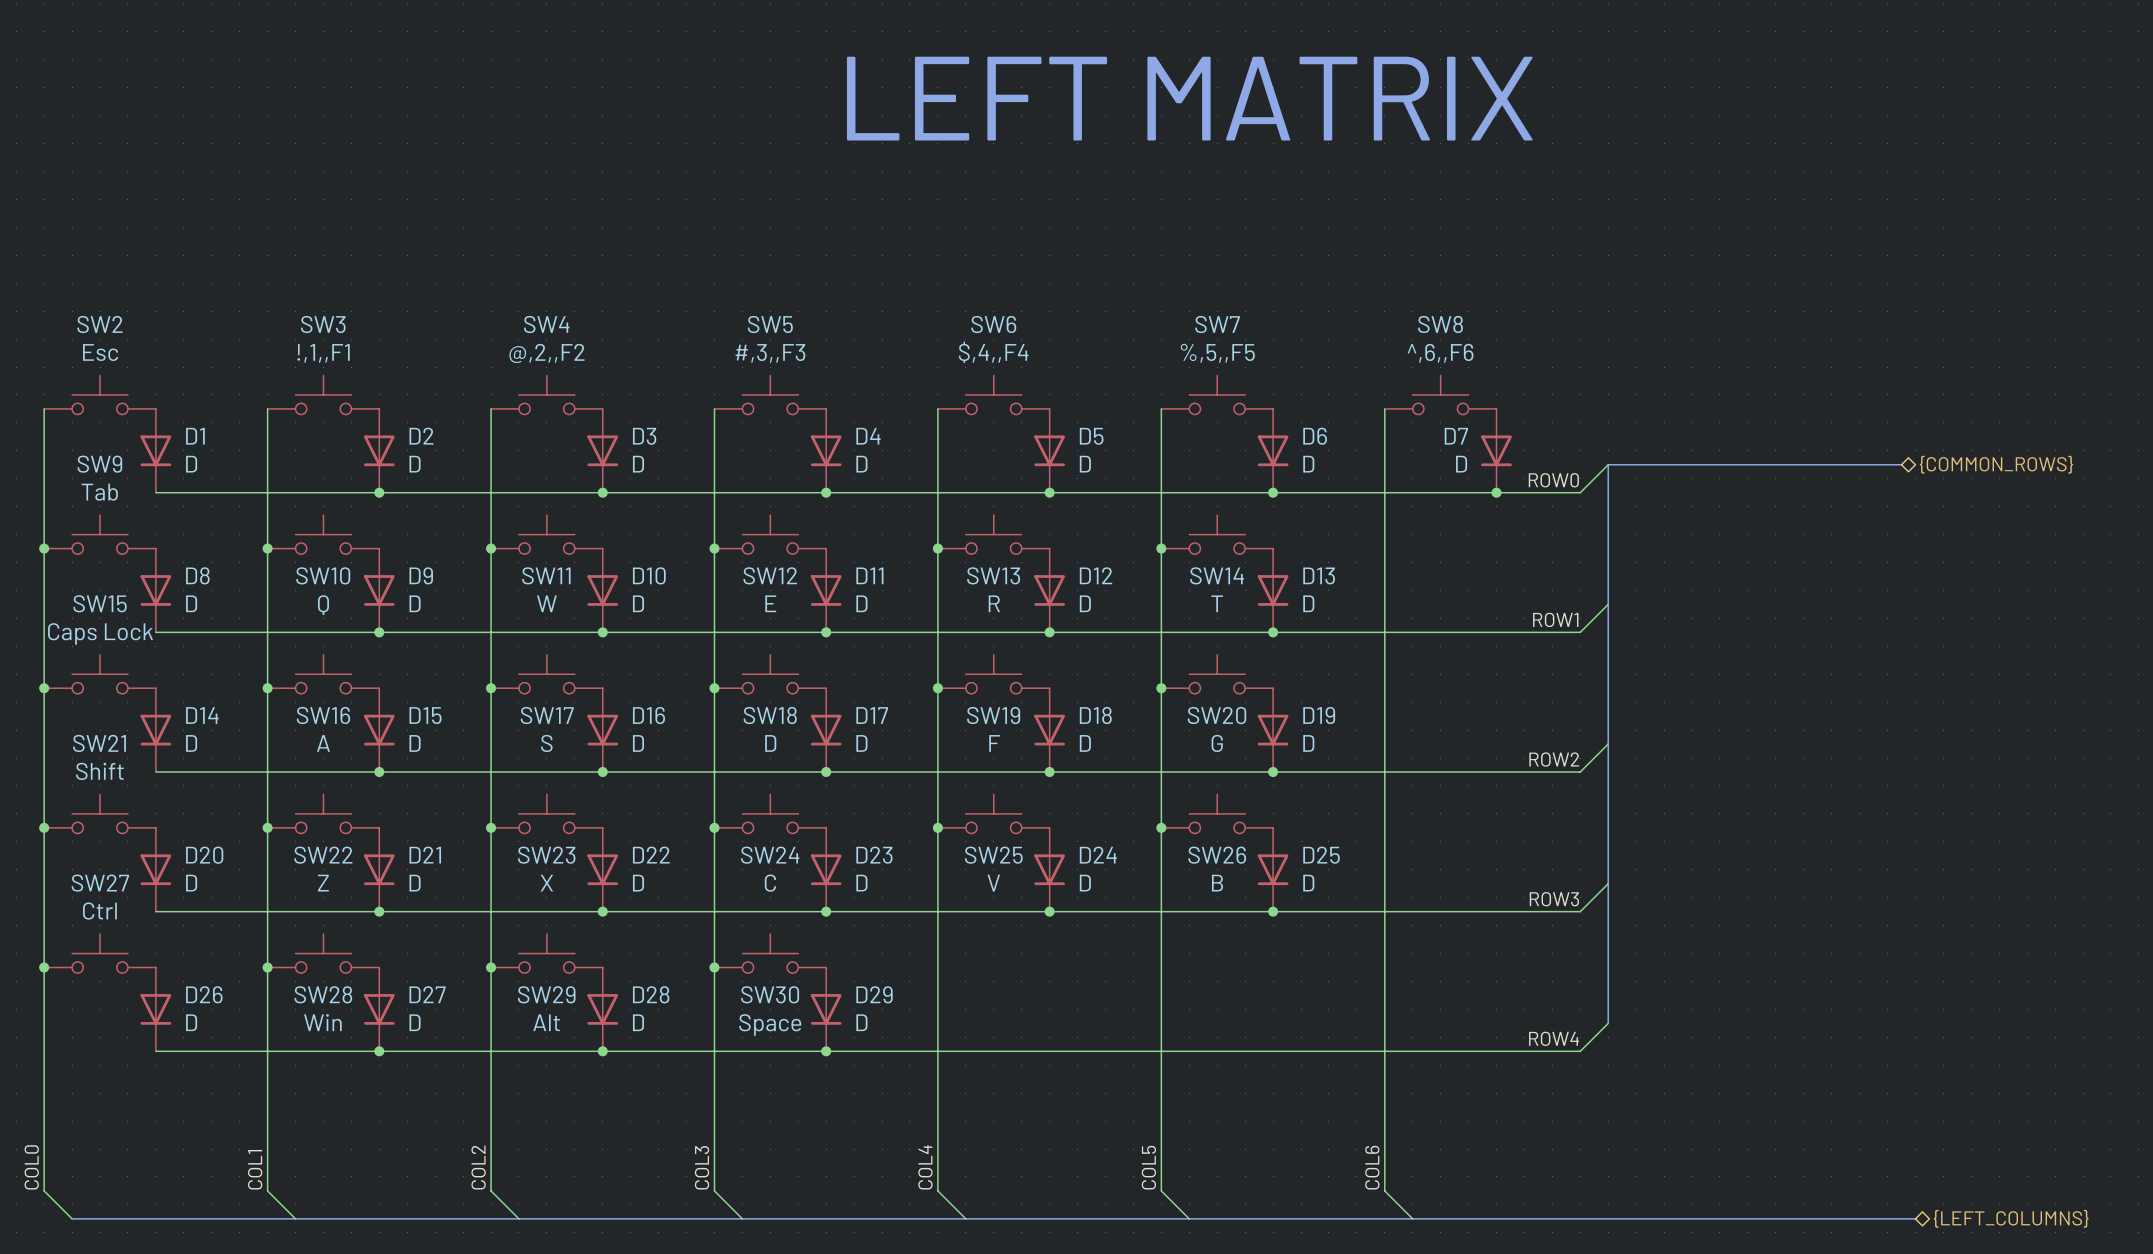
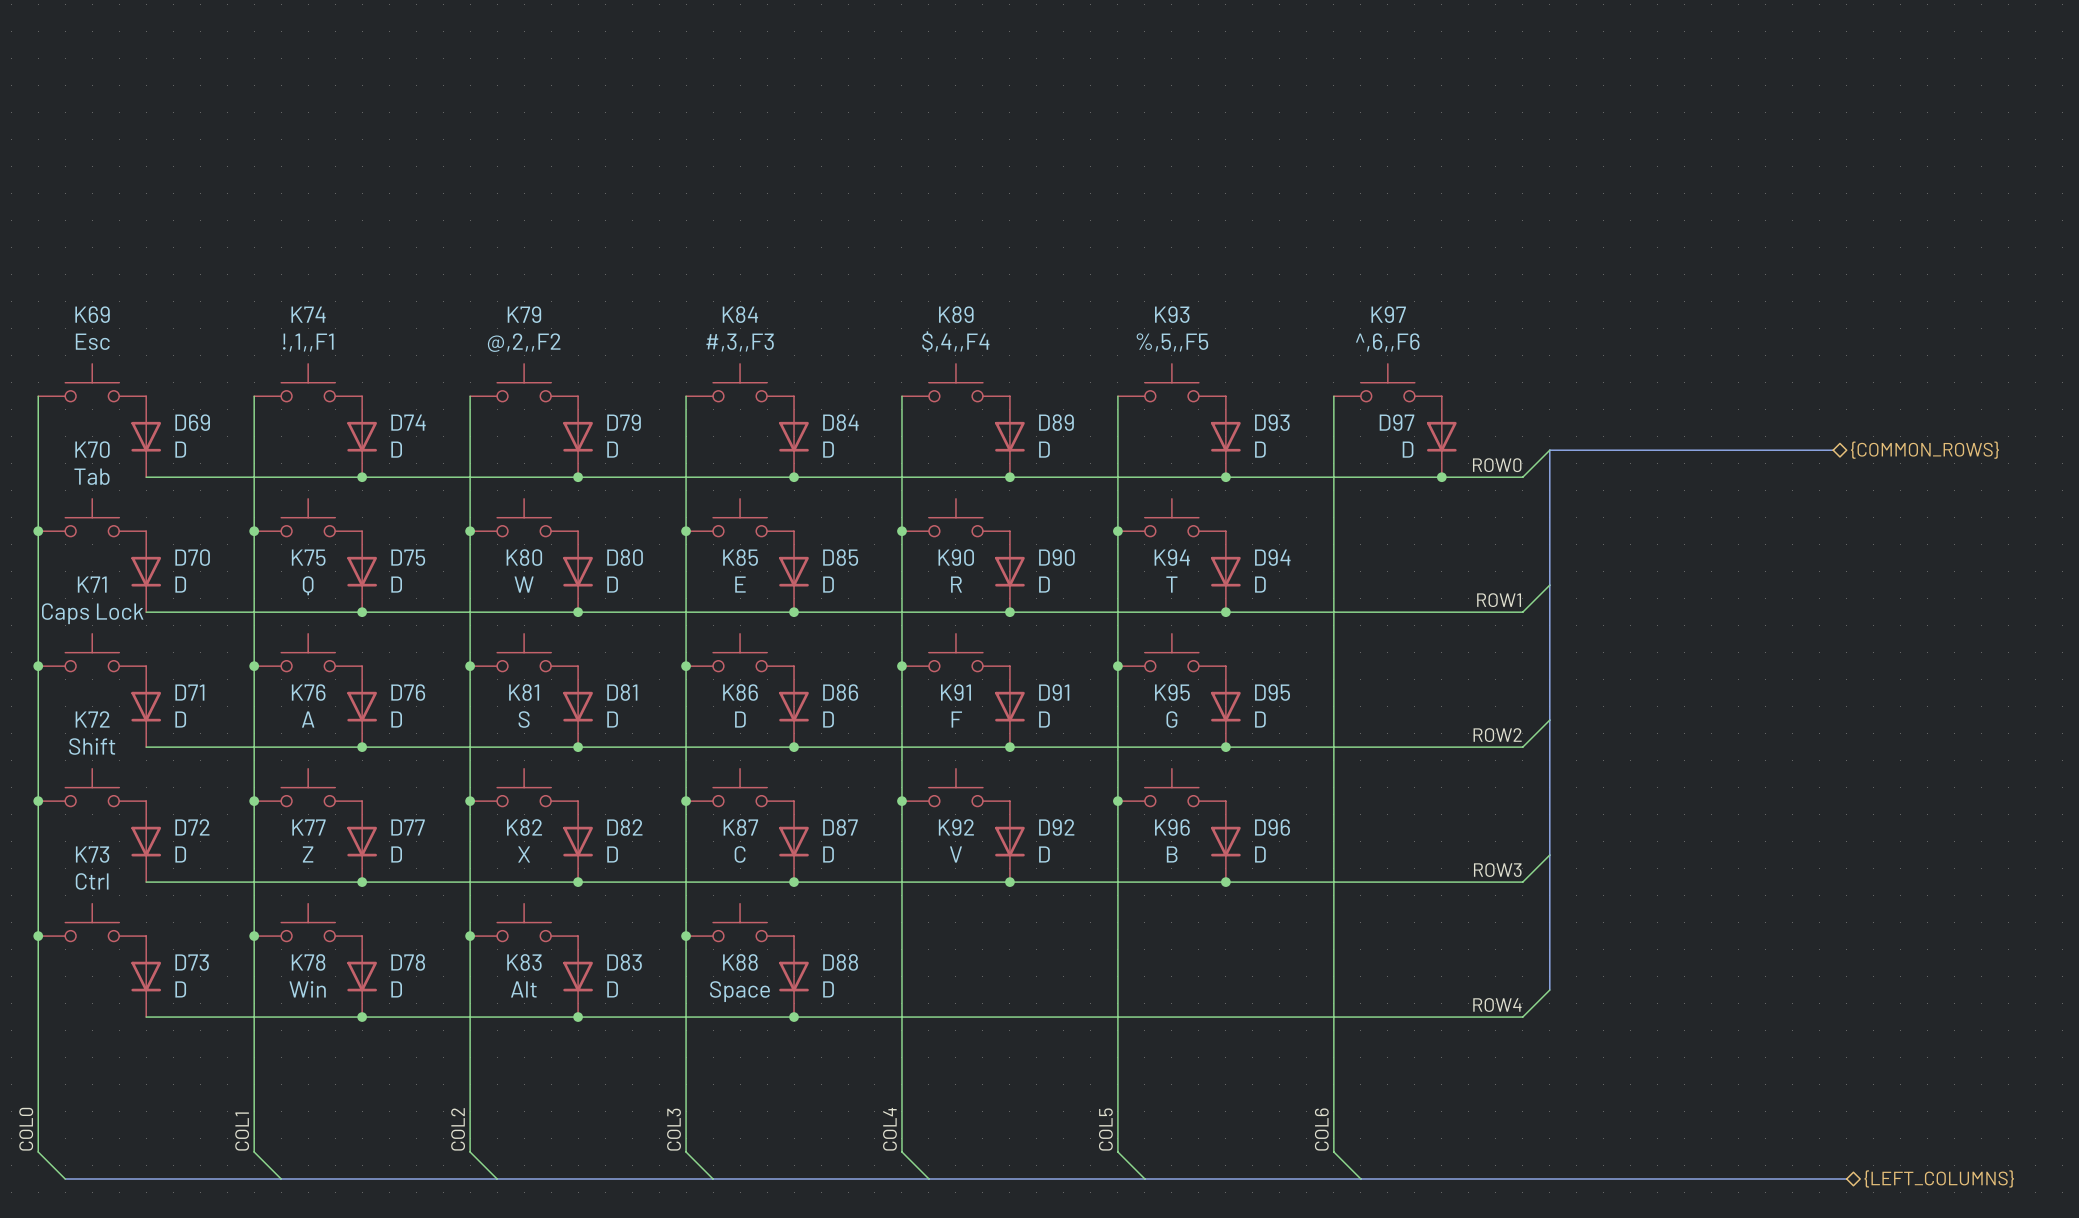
text: LEFT MATRIX (1189, 98) -> none
SW2 name: SW2 (99, 324) -> K69 (92, 314)
SW3 name: SW3 (323, 324) -> K74 (308, 314)
SW4 name: SW4 (546, 324) -> K79 (524, 314)
SW5 name: SW5 (770, 324) -> K84 (740, 314)
SW6 name: SW6 (993, 324) -> K89 (956, 314)
SW7 name: SW7 (1217, 324) -> K93 (1172, 314)
SW8 name: SW8 (1440, 324) -> K97 (1388, 314)
D1 name: D1 (195, 436) -> D69 (192, 422)
D2 name: D2 (421, 436) -> D74 (408, 422)
D3 name: D3 (644, 436) -> D79 (624, 422)
D4 name: D4 (868, 436) -> D84 (840, 422)
D5 name: D5 (1091, 436) -> D89 (1056, 422)
D6 name: D6 (1315, 436) -> D93 (1272, 422)
D7 name: D7 (1456, 436) -> D97 (1397, 422)
SW9 name: SW9 (99, 464) -> K70 (92, 449)
D8 name: D8 (197, 575) -> D70 (192, 557)
SW10 name: SW10 (323, 575) -> K75 (308, 557)
D9 name: D9 (421, 575) -> D75 (408, 557)
SW11 name: SW11 (546, 575) -> K80 (524, 557)
D10 name: D10 (649, 575) -> D80 (625, 557)
SW12 name: SW12 (770, 575) -> K85 (740, 557)
D11 name: D11 (869, 575) -> D85 (840, 557)
SW13 name: SW13 (993, 575) -> K90 (956, 557)
D12 name: D12 (1096, 575) -> D90 (1056, 557)
SW14 name: SW14 (1217, 575) -> K94 (1172, 557)
D13 name: D13 (1319, 575) -> D94 (1272, 557)
SW15 name: SW15 (100, 603) -> K71 (92, 584)
D14 name: D14 (202, 715) -> D71 (189, 692)
SW16 name: SW16 (323, 715) -> K76 (308, 692)
D15 name: D15 (425, 715) -> D76 (408, 692)
SW17 name: SW17 (547, 715) -> K81 (524, 692)
D16 name: D16 (648, 715) -> D81 (622, 692)
SW18 name: SW18 (770, 715) -> K86 (740, 692)
D17 name: D17 (872, 715) -> D86 (840, 692)
SW19 name: SW19 (993, 715) -> K91 (955, 692)
D18 name: D18 (1095, 715) -> D91 (1054, 692)
SW20 name: SW20 (1216, 715) -> K95 (1172, 692)
D19 name: D19 (1319, 715) -> D95 (1272, 692)
SW21 name: SW21 (99, 743) -> K72 (92, 719)
D20 name: D20 (204, 855) -> D72 (192, 827)
SW22 name: SW22 (323, 855) -> K77 (308, 827)
D21 name: D21 (425, 855) -> D77 (408, 827)
SW23 name: SW23 (546, 855) -> K82 (524, 827)
D22 name: D22 (651, 855) -> D82 (624, 827)
SW24 name: SW24 (770, 855) -> K87 (740, 827)
D23 name: D23 (874, 855) -> D87 (840, 827)
SW25 name: SW25 (993, 855) -> K92 (956, 827)
D24 name: D24 (1098, 855) -> D92 (1056, 827)
SW26 name: SW26 (1217, 855) -> K96 (1172, 827)
D25 name: D25 (1321, 855) -> D96 (1272, 827)
SW27 name: SW27 (100, 883) -> K73 (92, 854)
D26 name: D26 (204, 994) -> D73 (192, 962)
SW28 name: SW28 (323, 994) -> K78 (308, 962)
D27 name: D27 (427, 994) -> D78 (408, 962)
SW29 name: SW29 (546, 994) -> K83 (524, 962)
D28 name: D28 (651, 994) -> D83 (624, 962)
SW30 name: SW30 (770, 994) -> K88 (740, 962)
D29 name: D29 (874, 994) -> D88 (840, 962)

